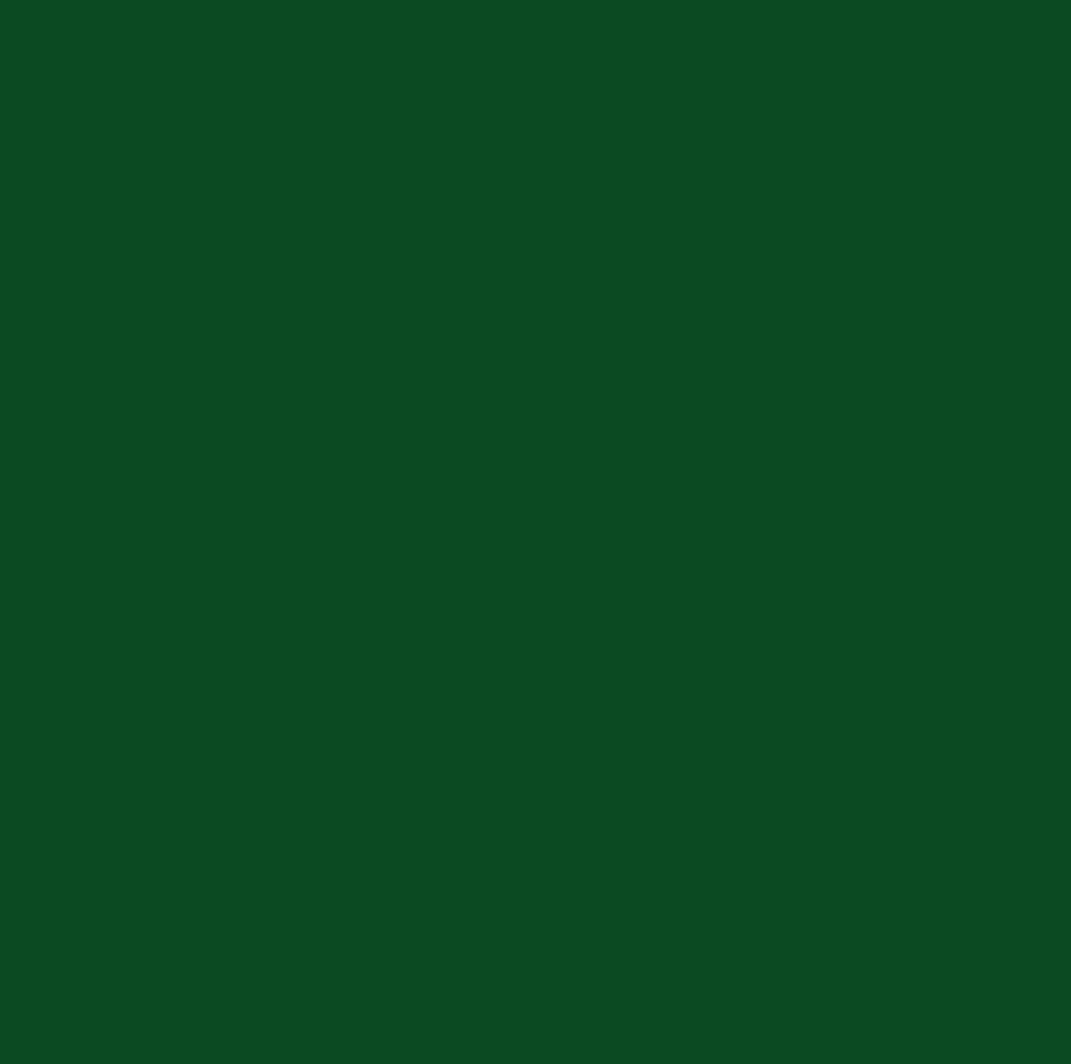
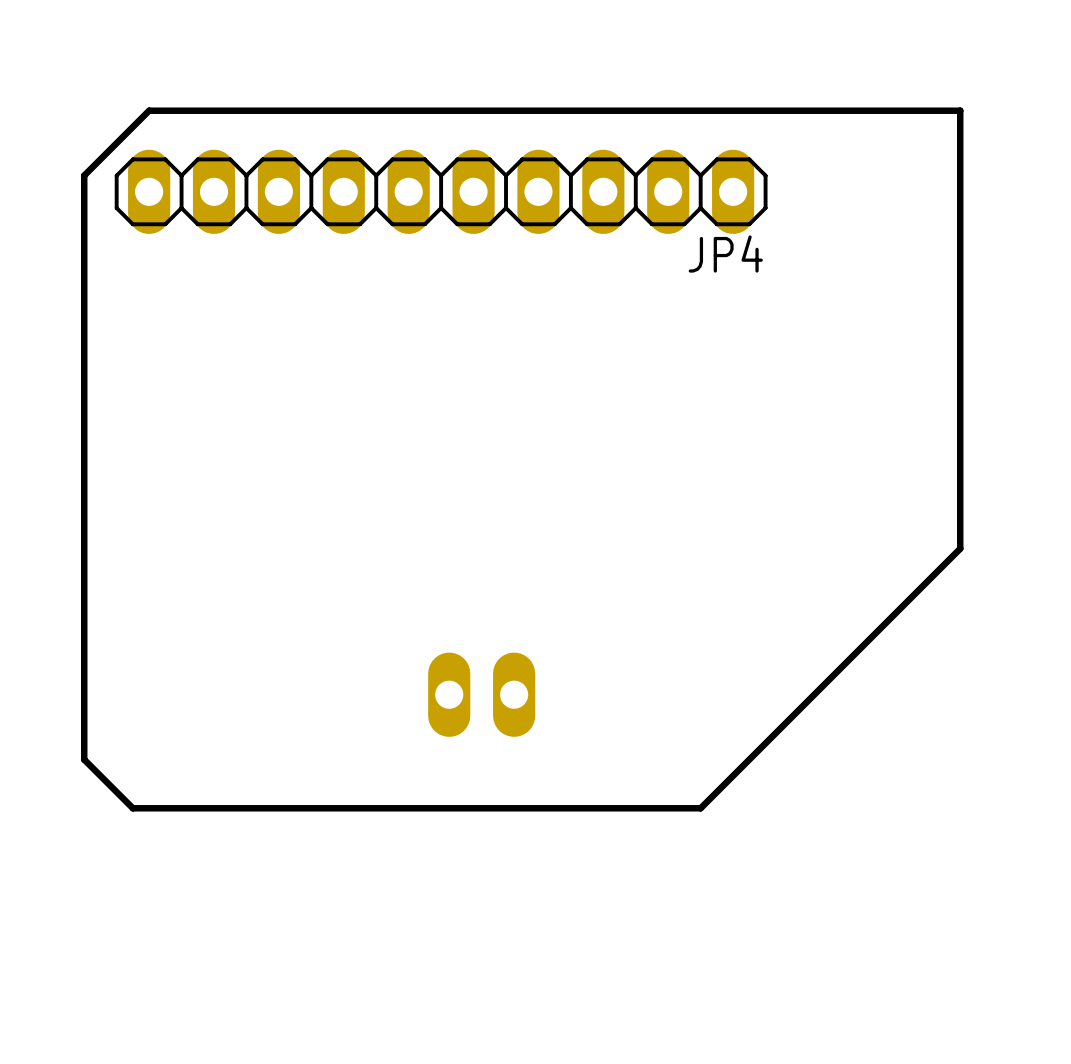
board edge: none -> (149, 110) (960, 110) (960, 548) (700, 808) (132, 808) (84, 759) (84, 175) (149, 110)
JP4: none -> (441, 191)
part: none -> (481, 694)

